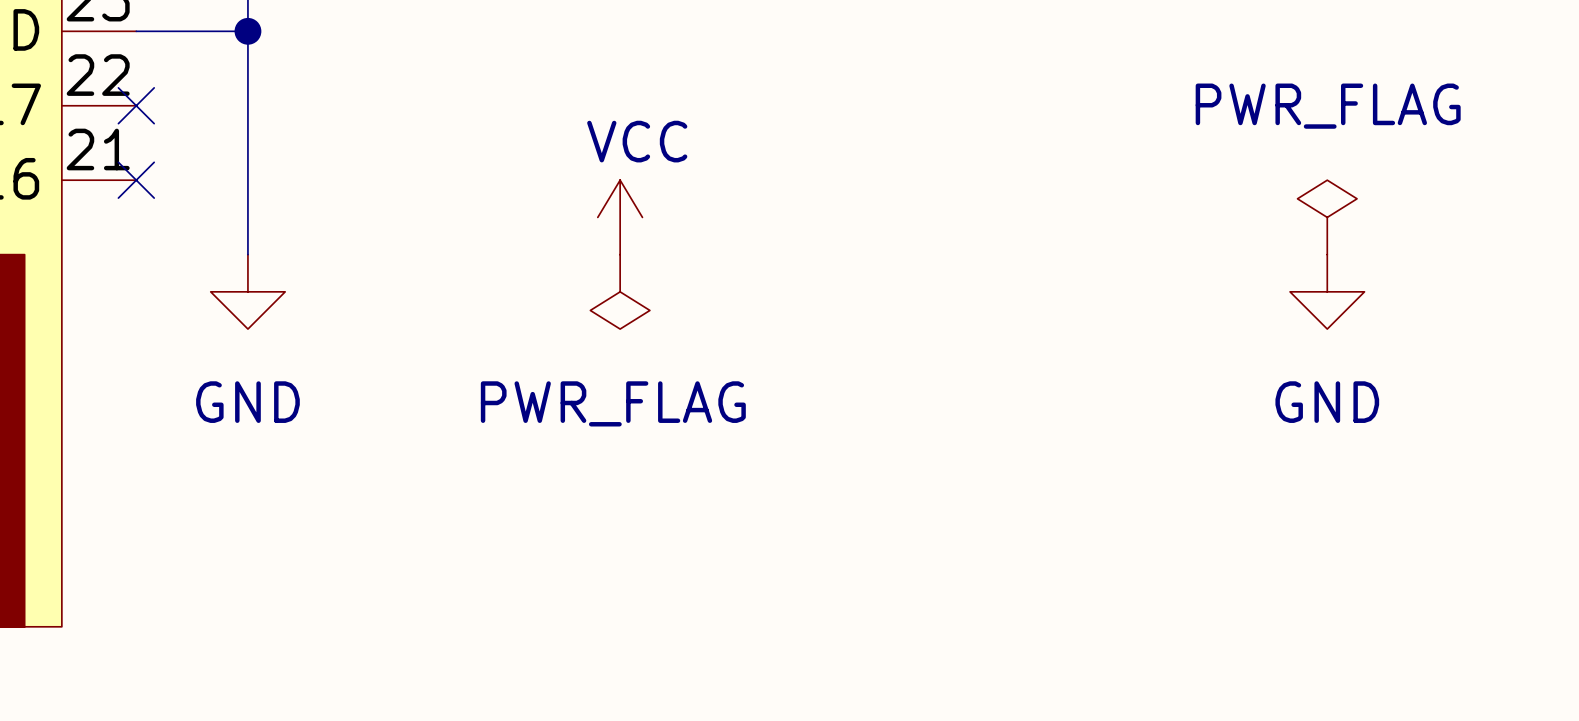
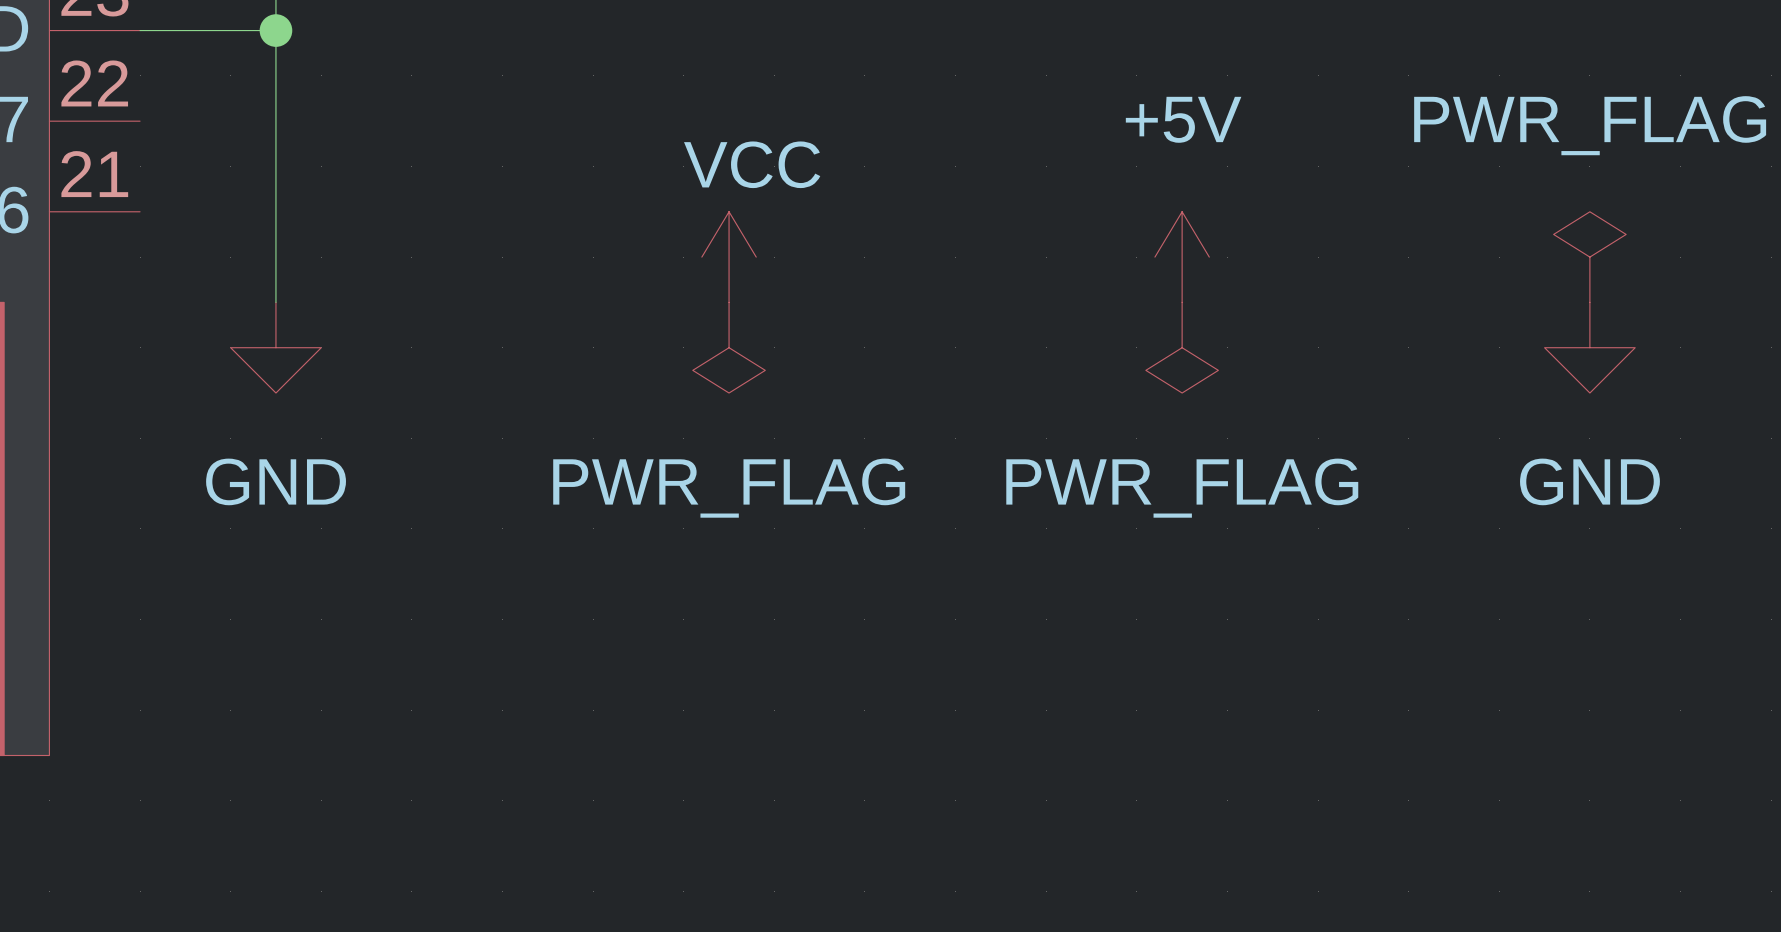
no-connect mark: (136, 105) -> none
no-connect mark: (136, 180) -> none
power symbol: none -> +5V (1182, 257)
power symbol: none -> PWR_FLAG (1182, 347)

